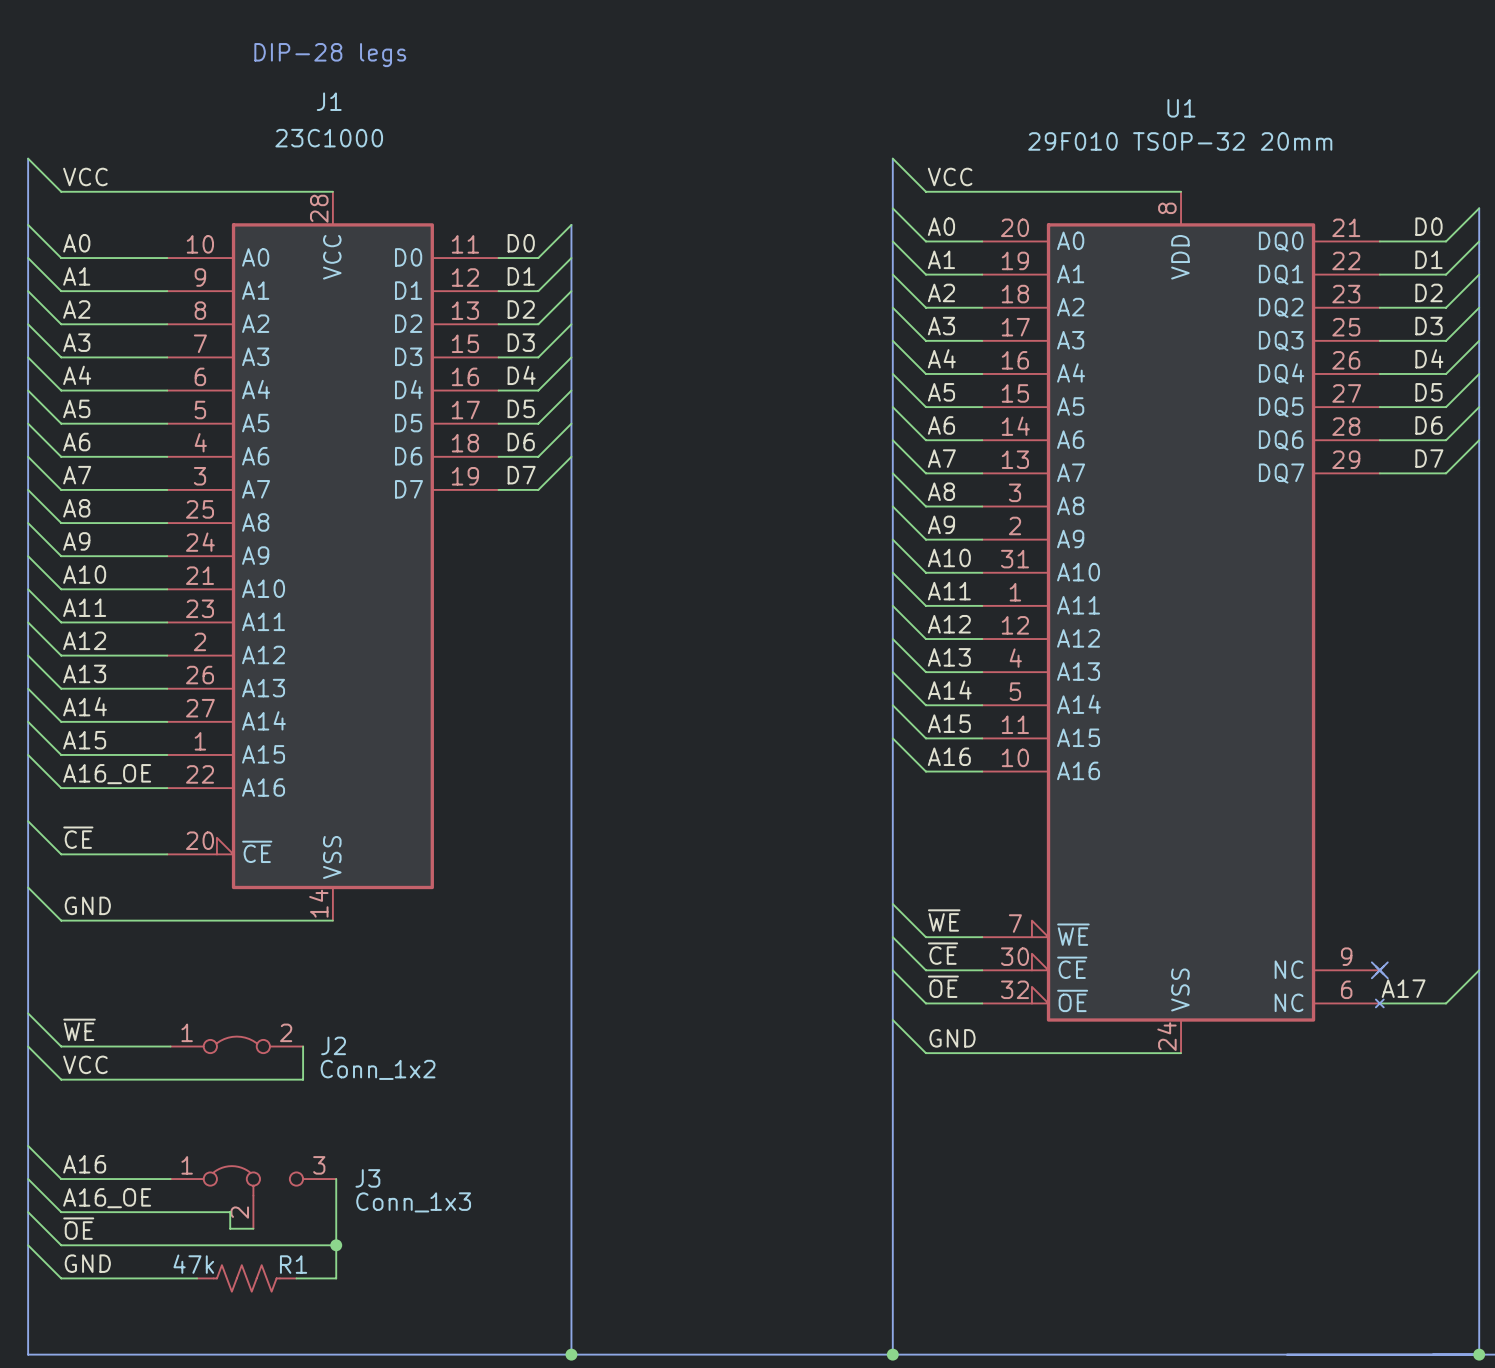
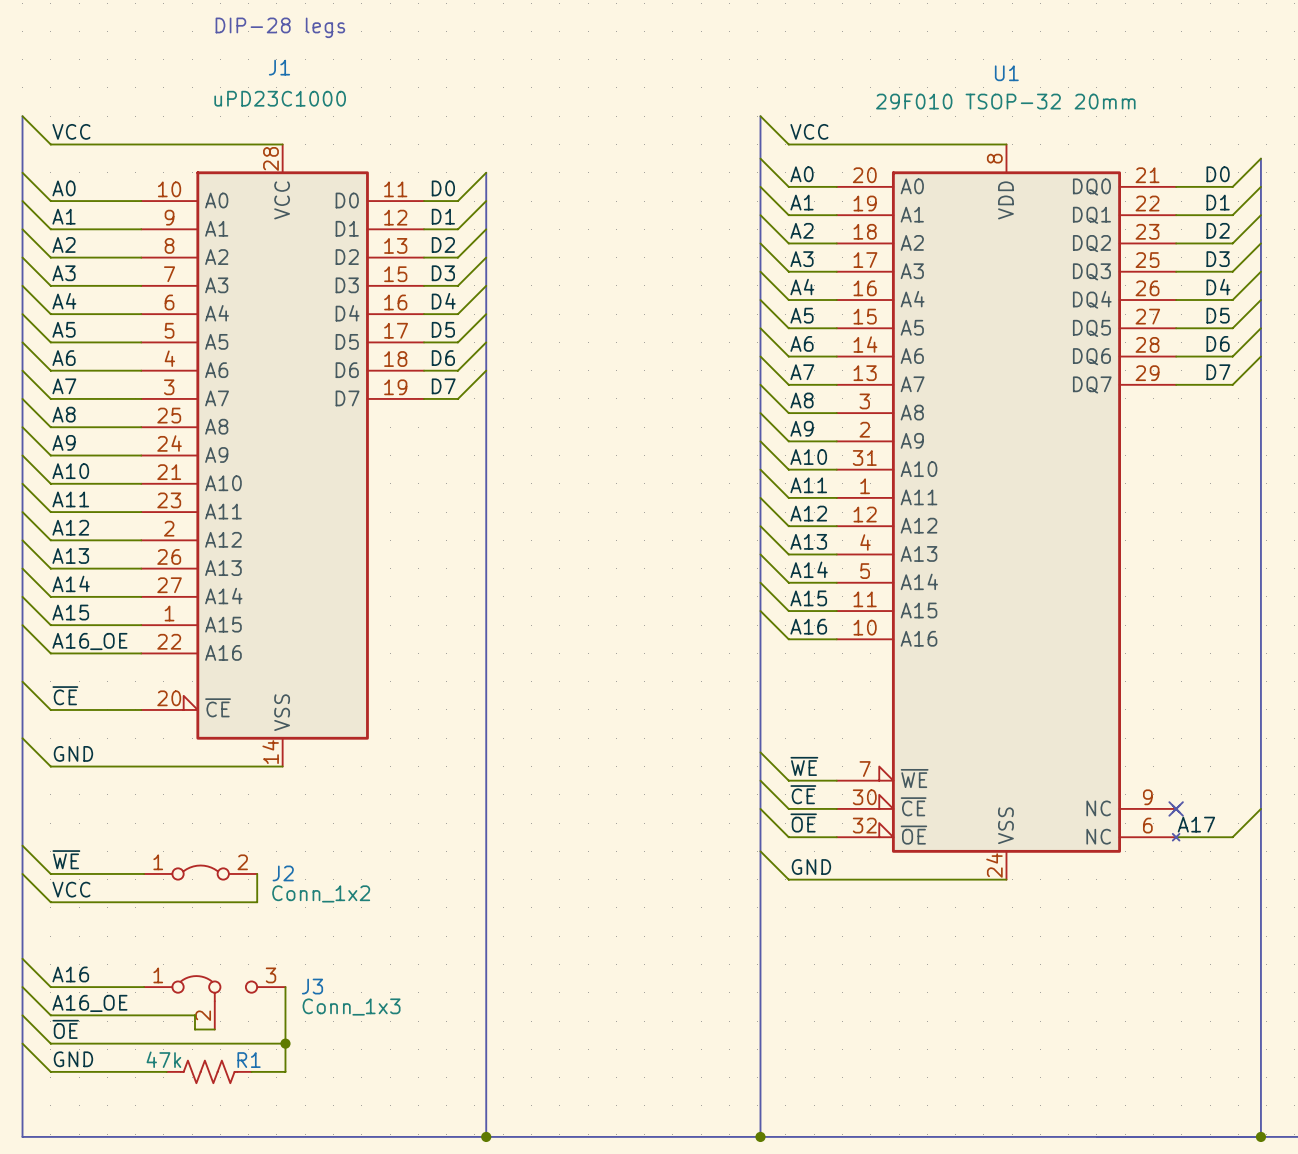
J1 value: 23C1000 (329, 138) -> uPD23C1000 (280, 98)

